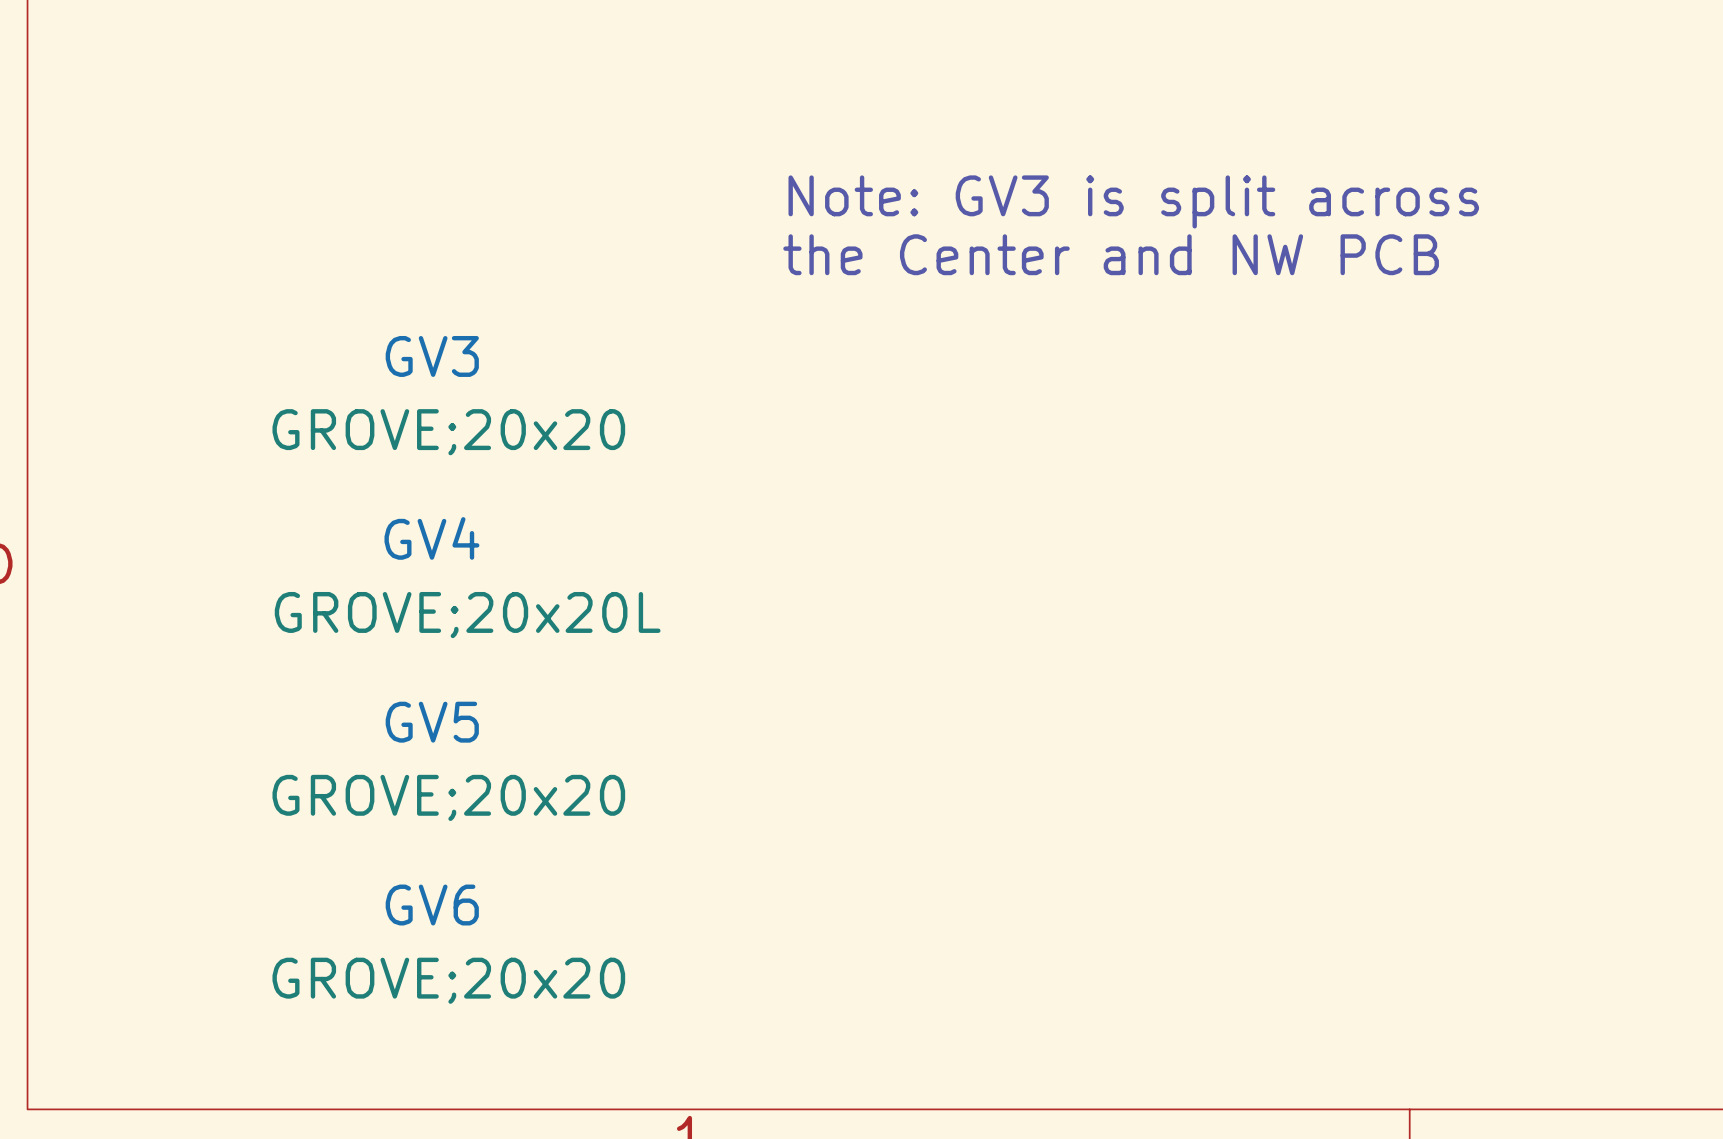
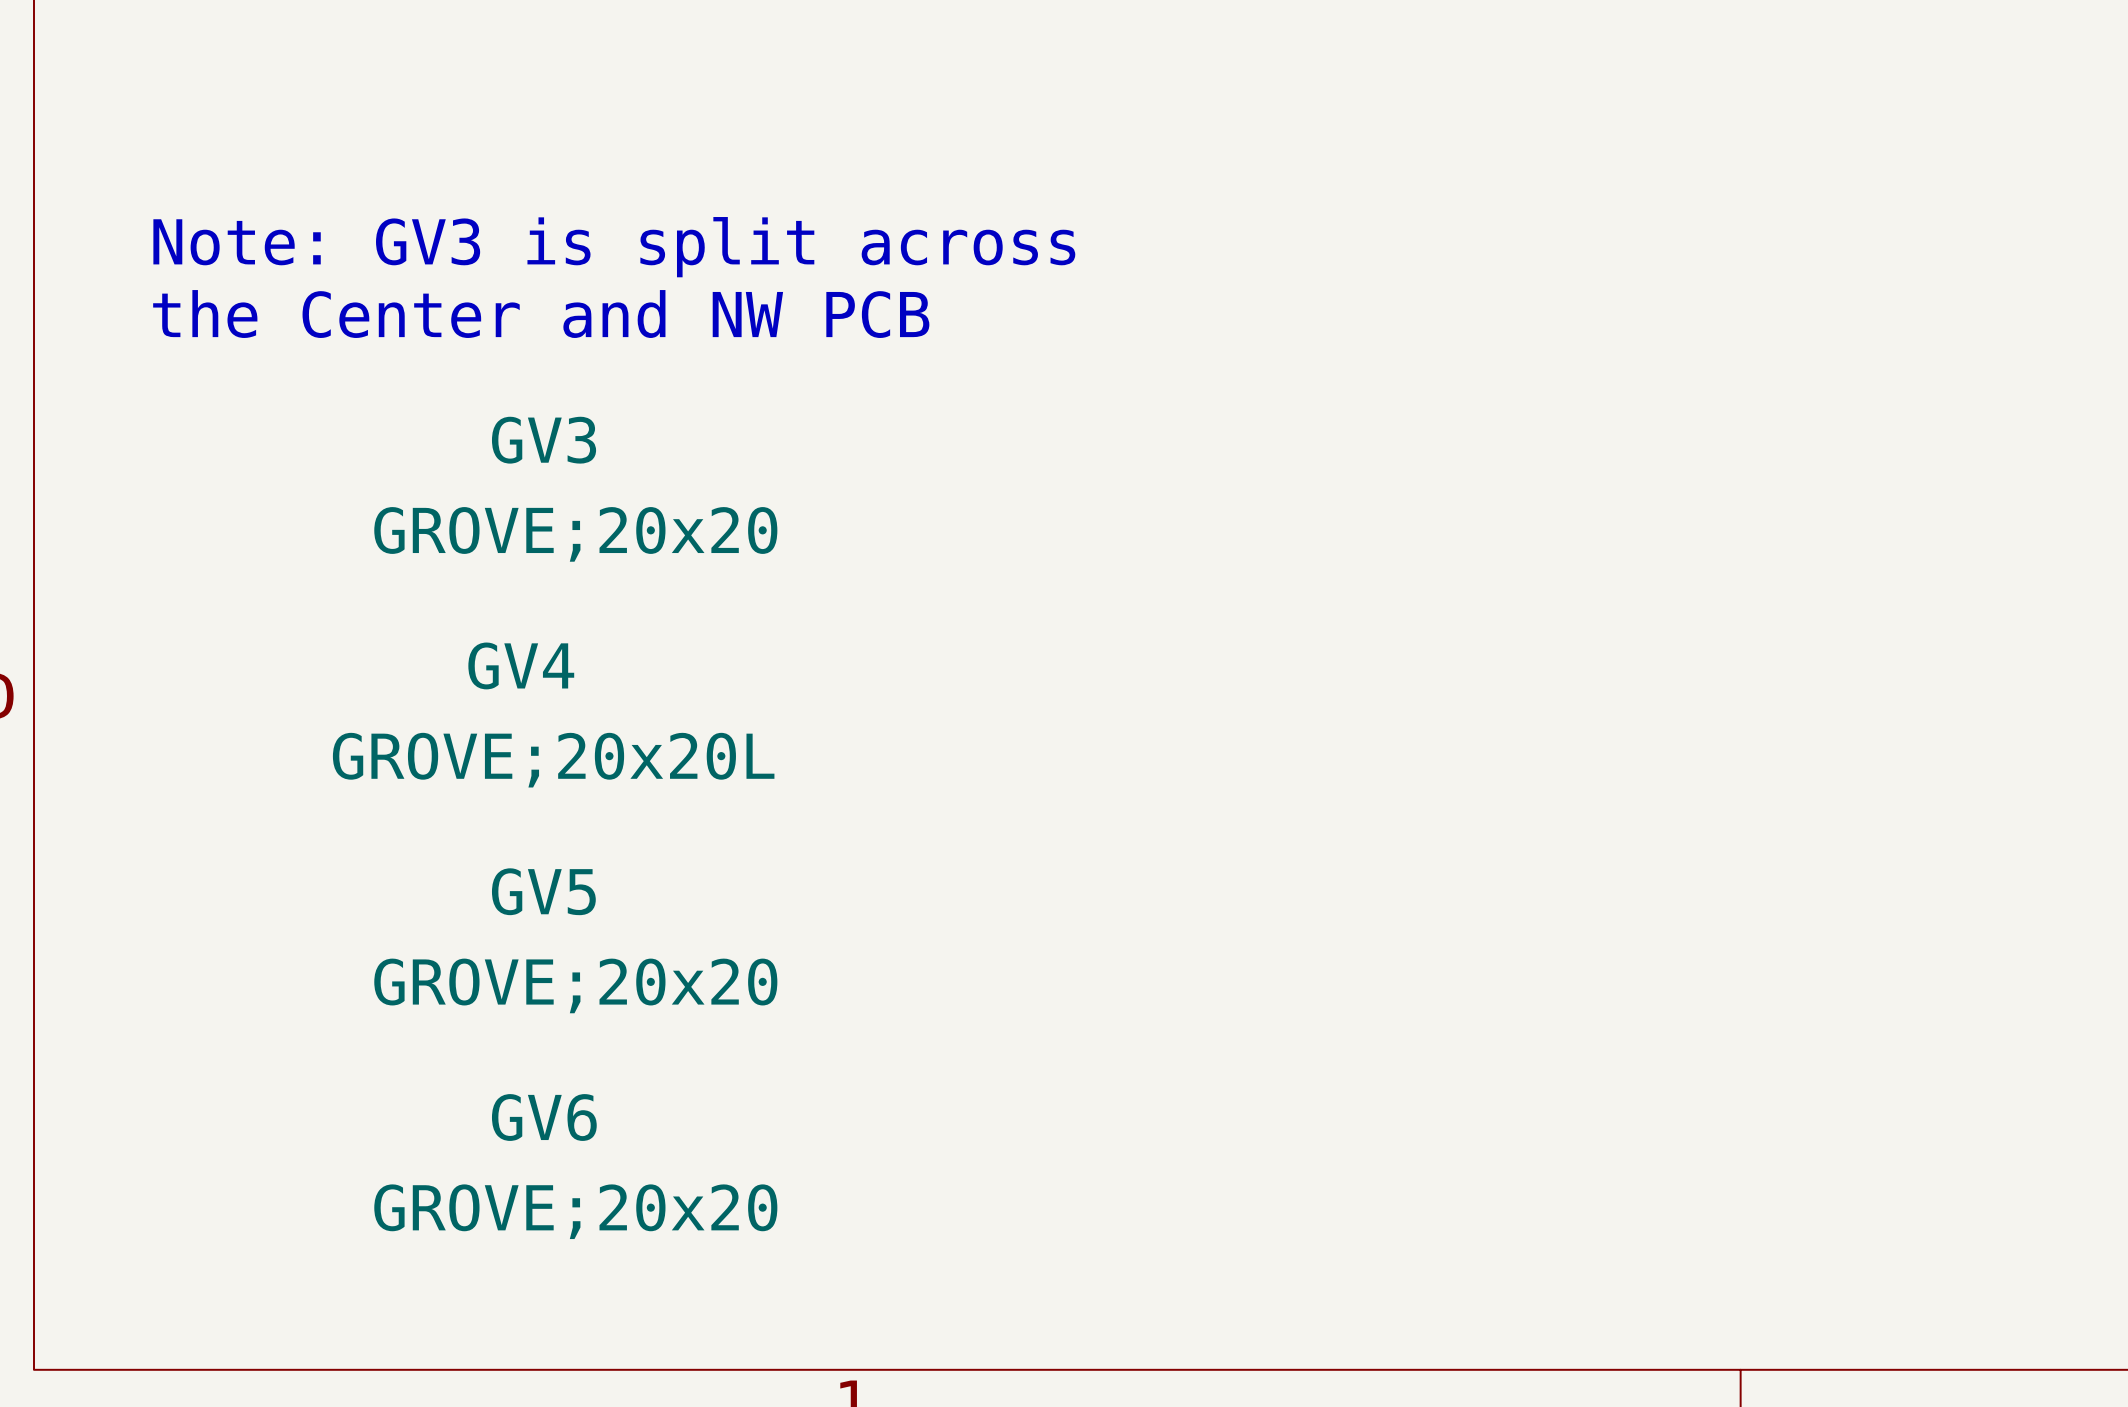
text position: Note: GV3 is split across (1133, 201) -> Note: GV3 is split across (614, 247)
text position: the Center and NW PCB (1111, 254) -> the Center and NW PCB (541, 314)

